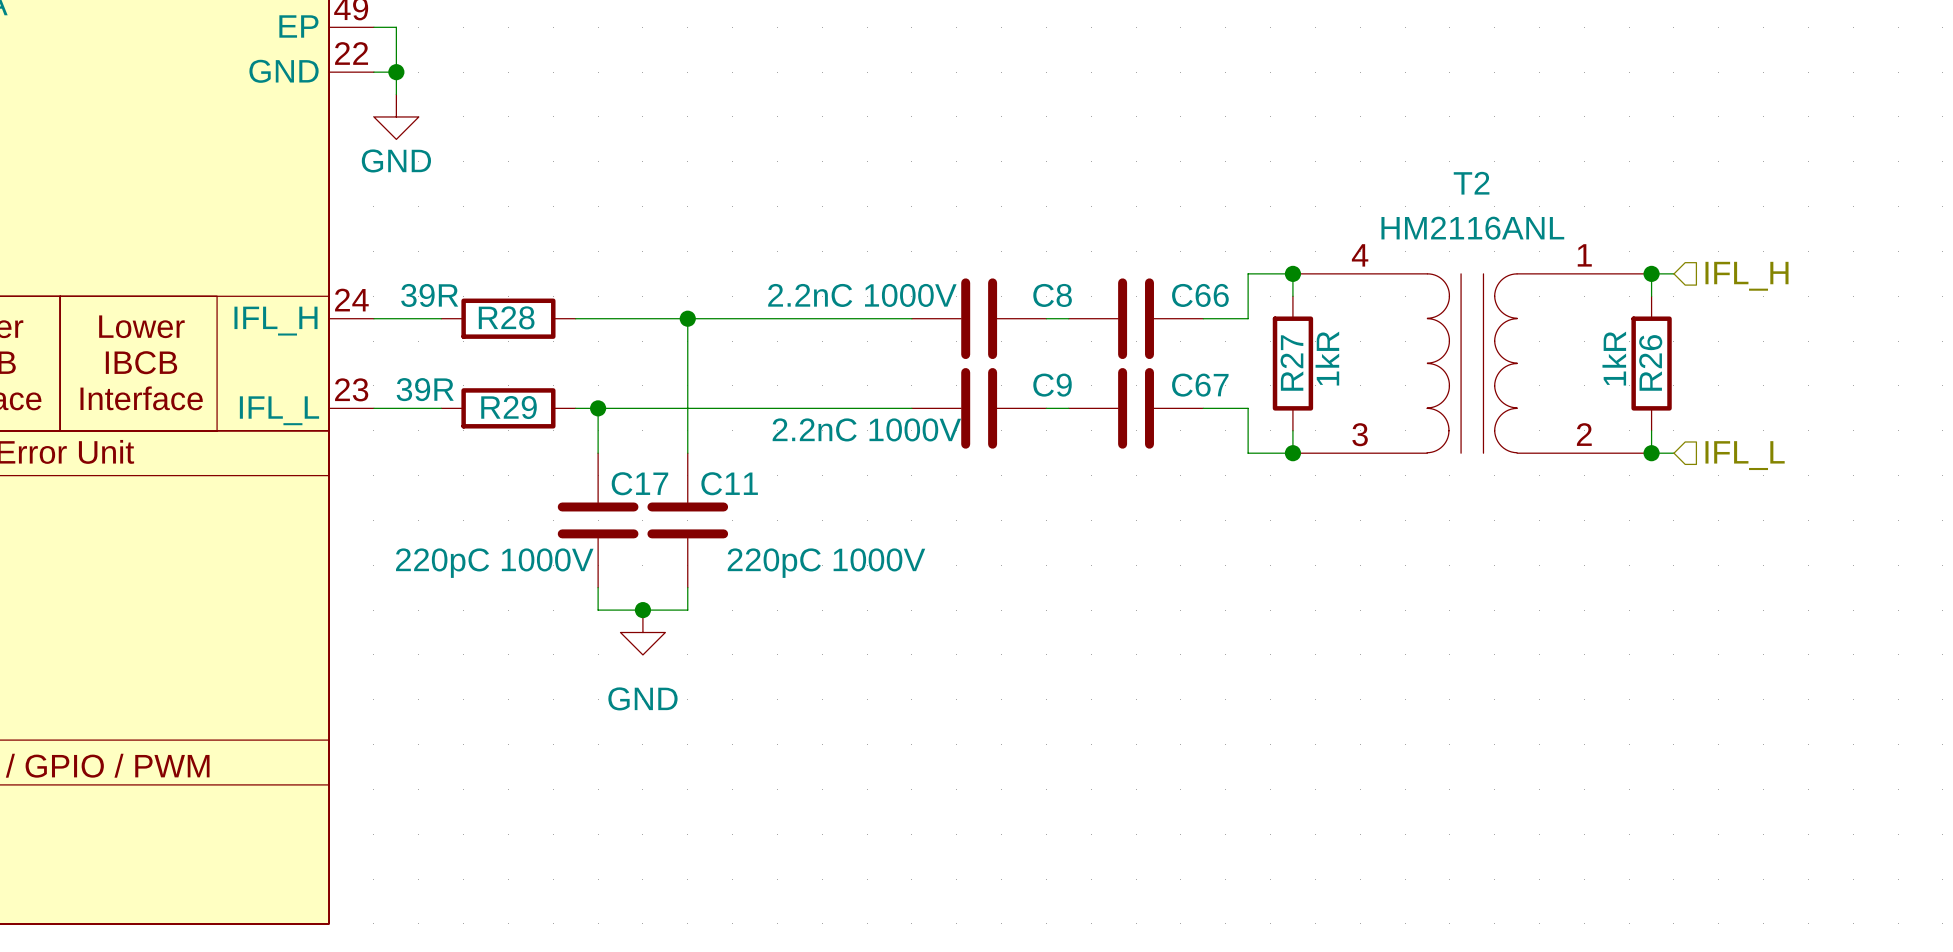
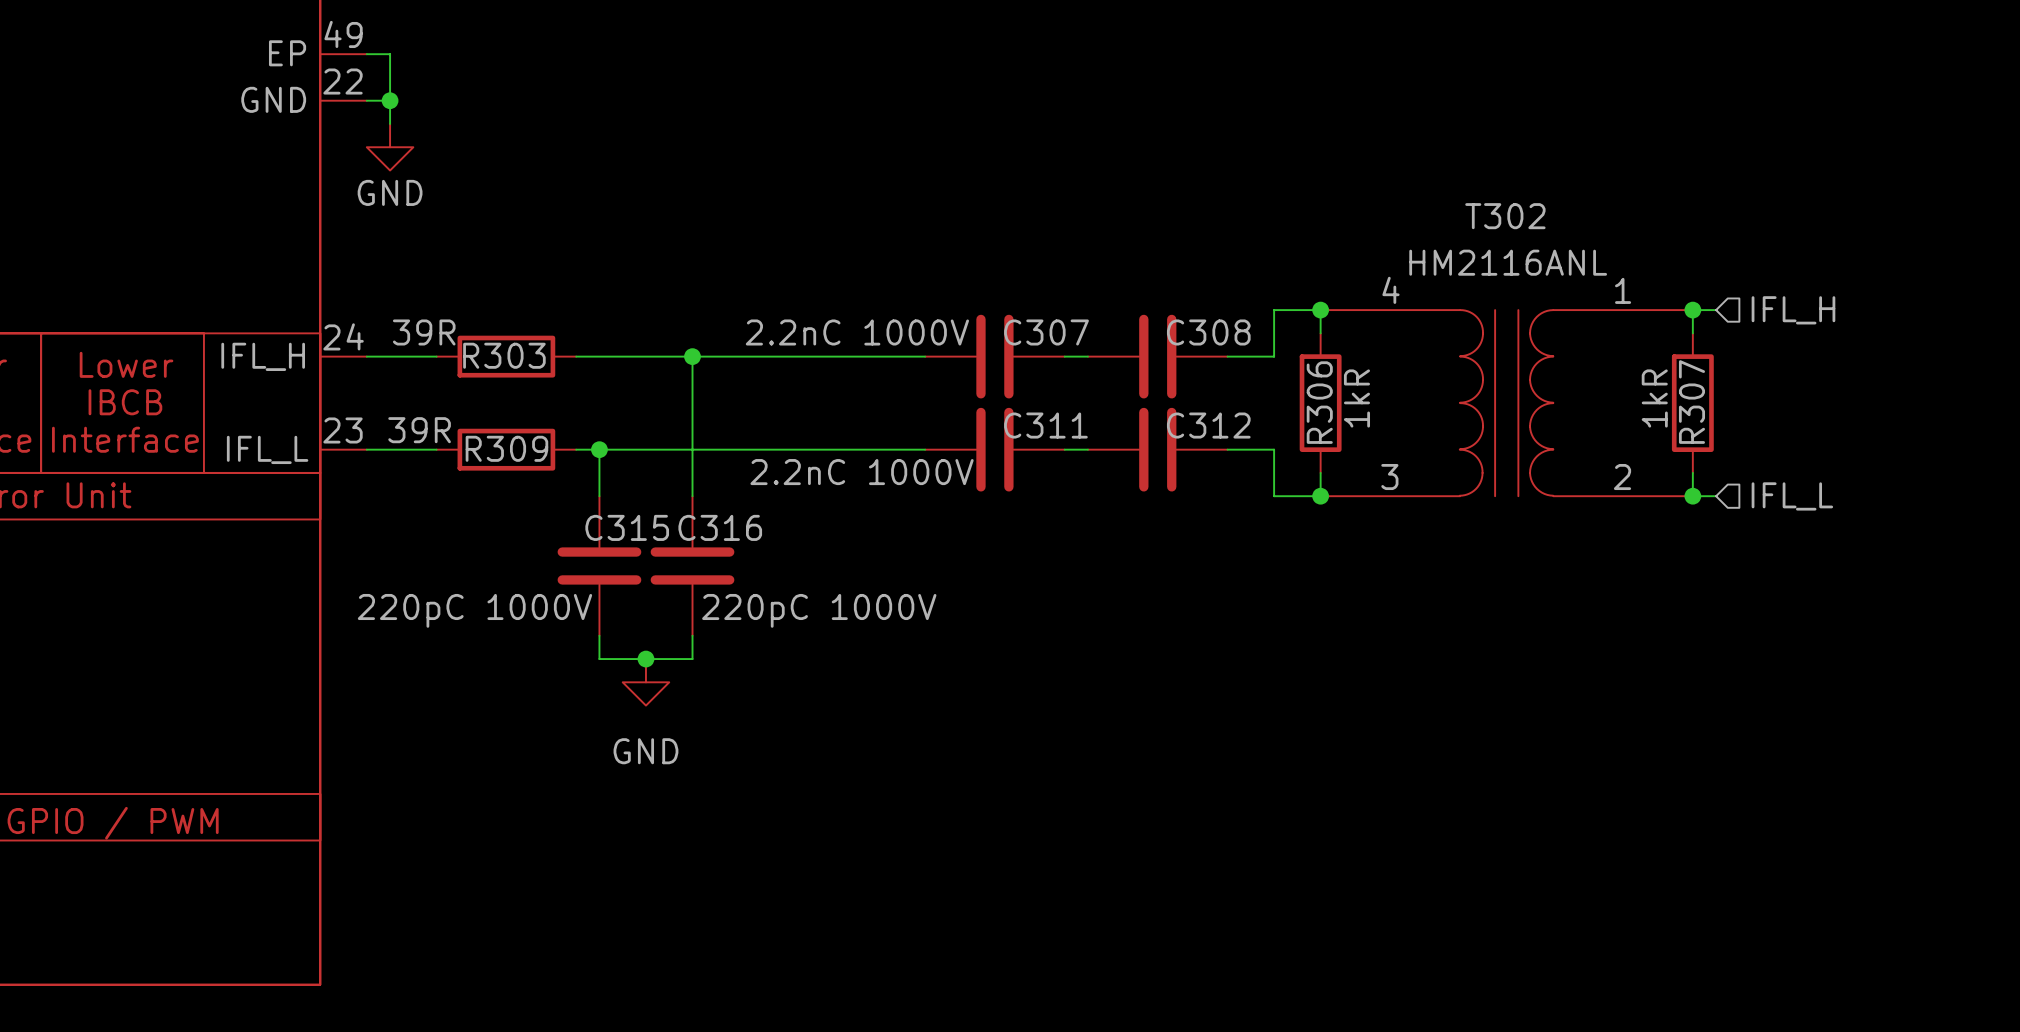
T2 name: T2 (1471, 183) -> T302 (1505, 216)
C8 name: C8 (1052, 295) -> C307 (1046, 332)
C66 name: C66 (1200, 295) -> C308 (1208, 332)
R28 name: R28 (506, 317) -> R303 (504, 355)
R26 name: R26 (1650, 362) -> R307 (1691, 402)
R27 name: R27 (1291, 363) -> R306 (1319, 402)
C9 name: C9 (1052, 385) -> C311 (1045, 425)
C67 name: C67 (1200, 385) -> C312 (1208, 425)
R29 name: R29 (509, 407) -> R309 (506, 448)
C17 name: C17 (639, 483) -> C315 (627, 527)
C11 name: C11 (729, 483) -> C316 (720, 527)

